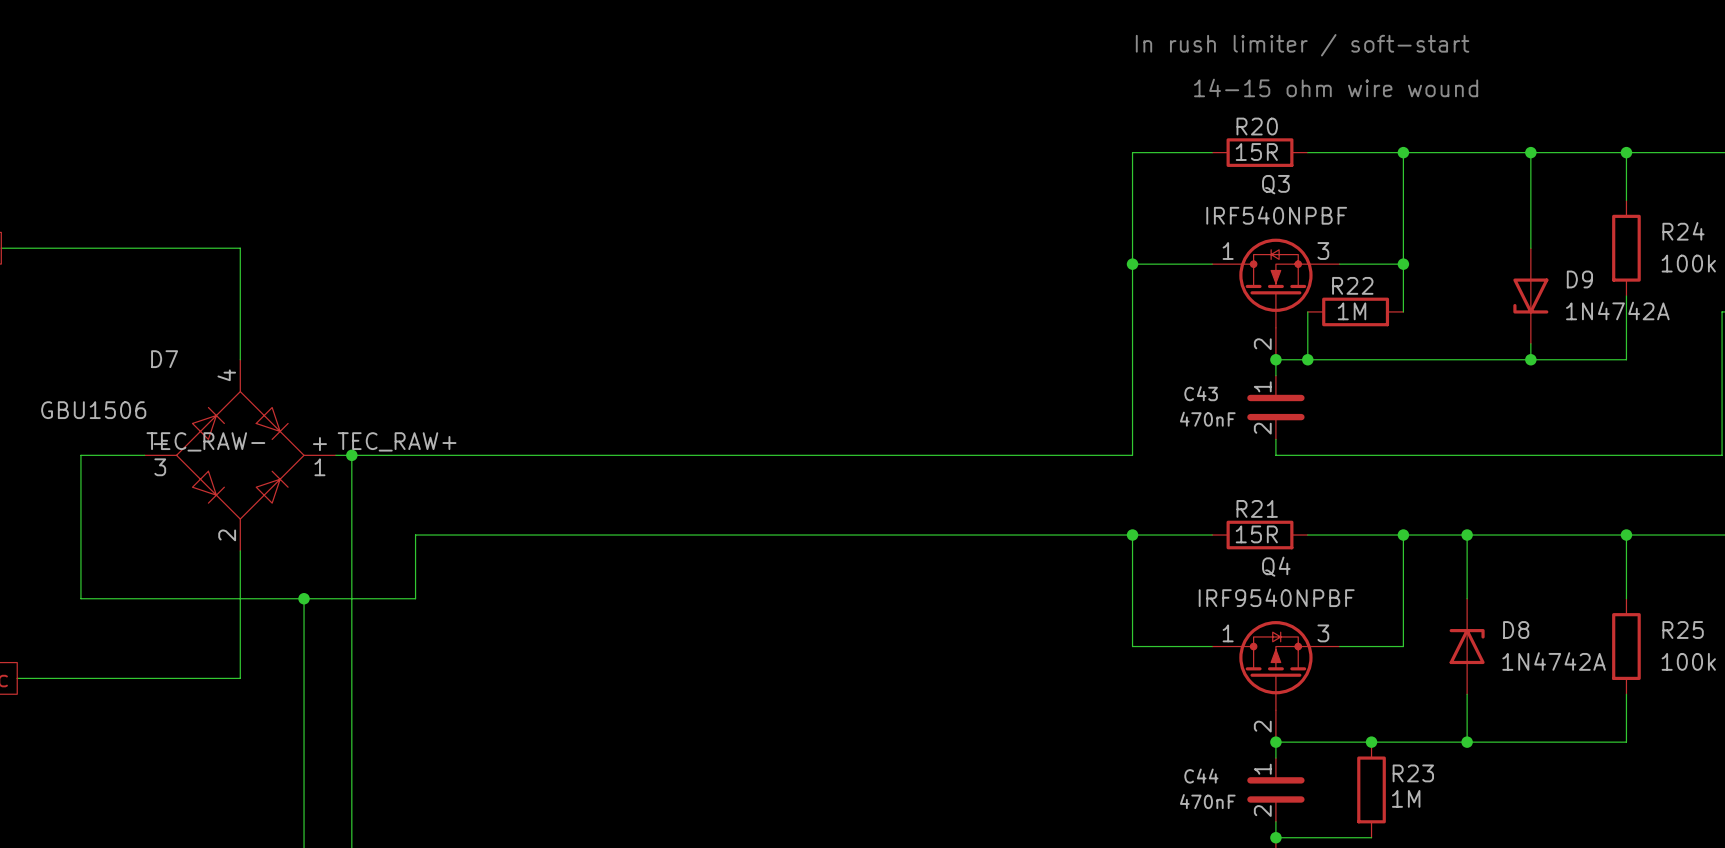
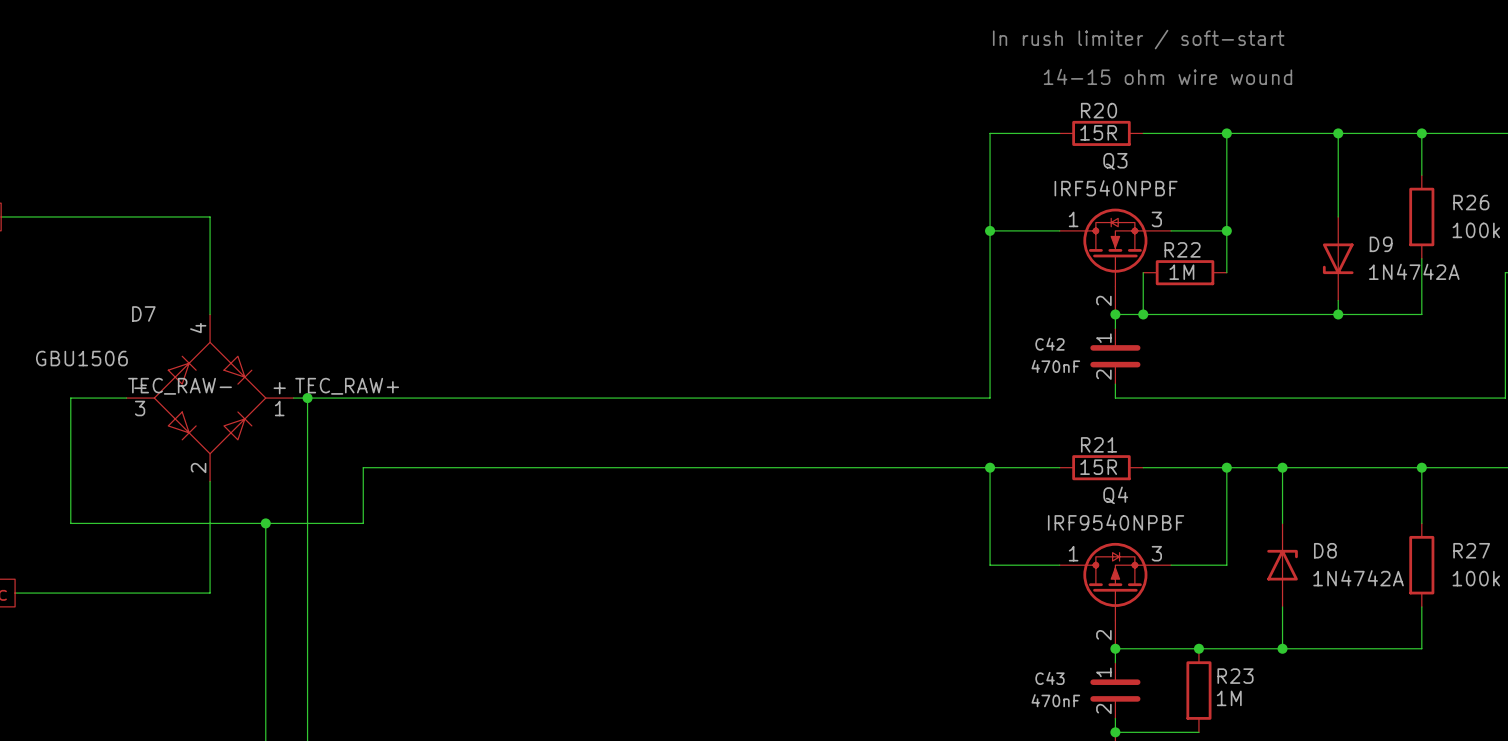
R24 name: R24 (1683, 231) -> R26 (1471, 202)
C43 name: C43 (1201, 393) -> C42 (1049, 344)
R25 name: R25 (1683, 630) -> R27 (1471, 550)
C44 name: C44 (1201, 776) -> C43 (1049, 678)

